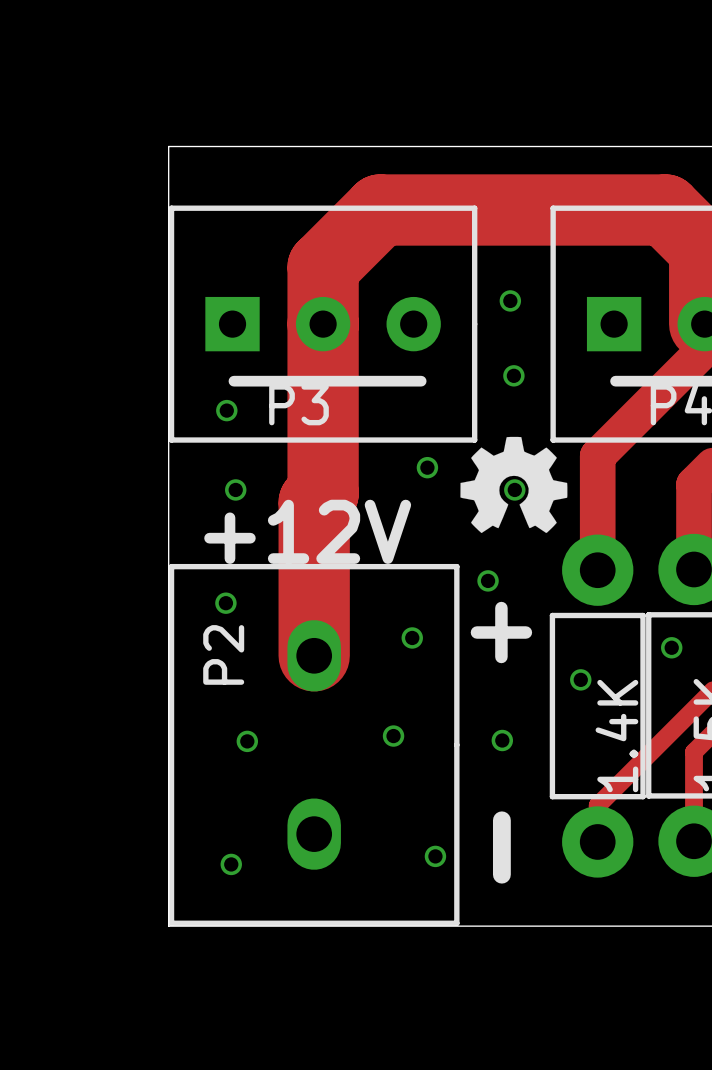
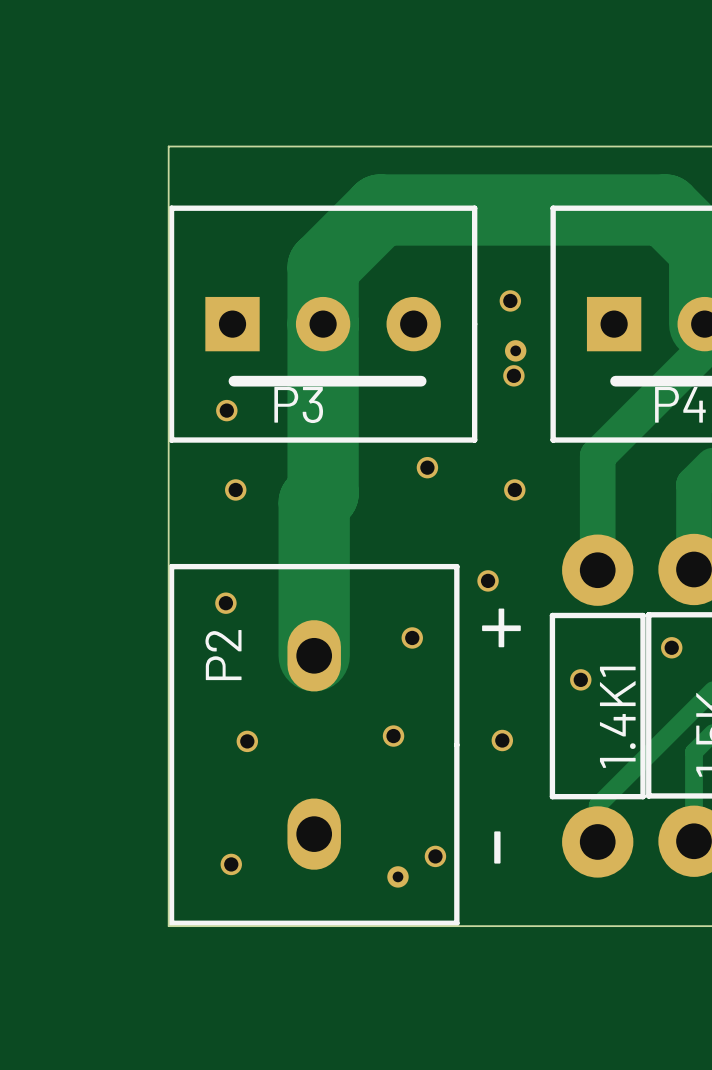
part: none -> (515, 350)
drawing: [460, 436, 568, 534] -> none
text: +12V (307, 531) -> none
1.4K name: 1.4K (616, 736) -> 1.4K1 (617, 717)
part: none -> (398, 876)

